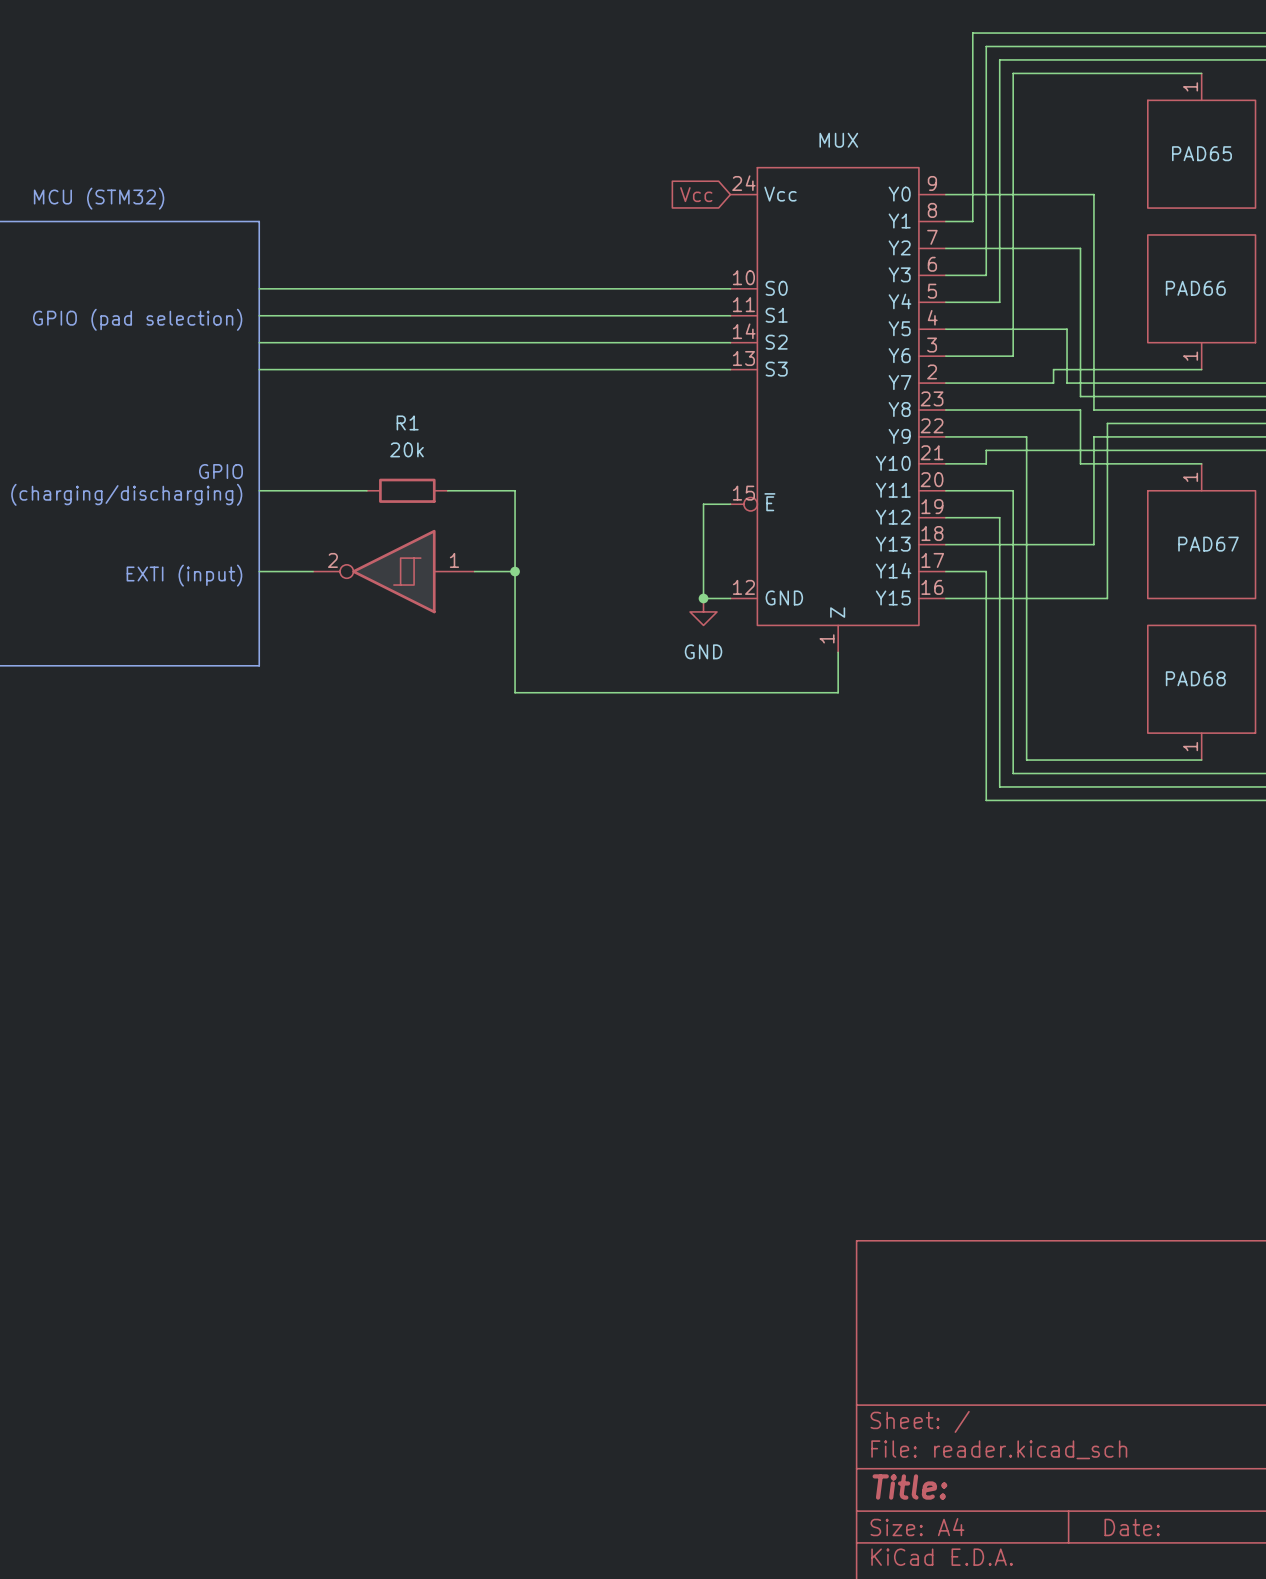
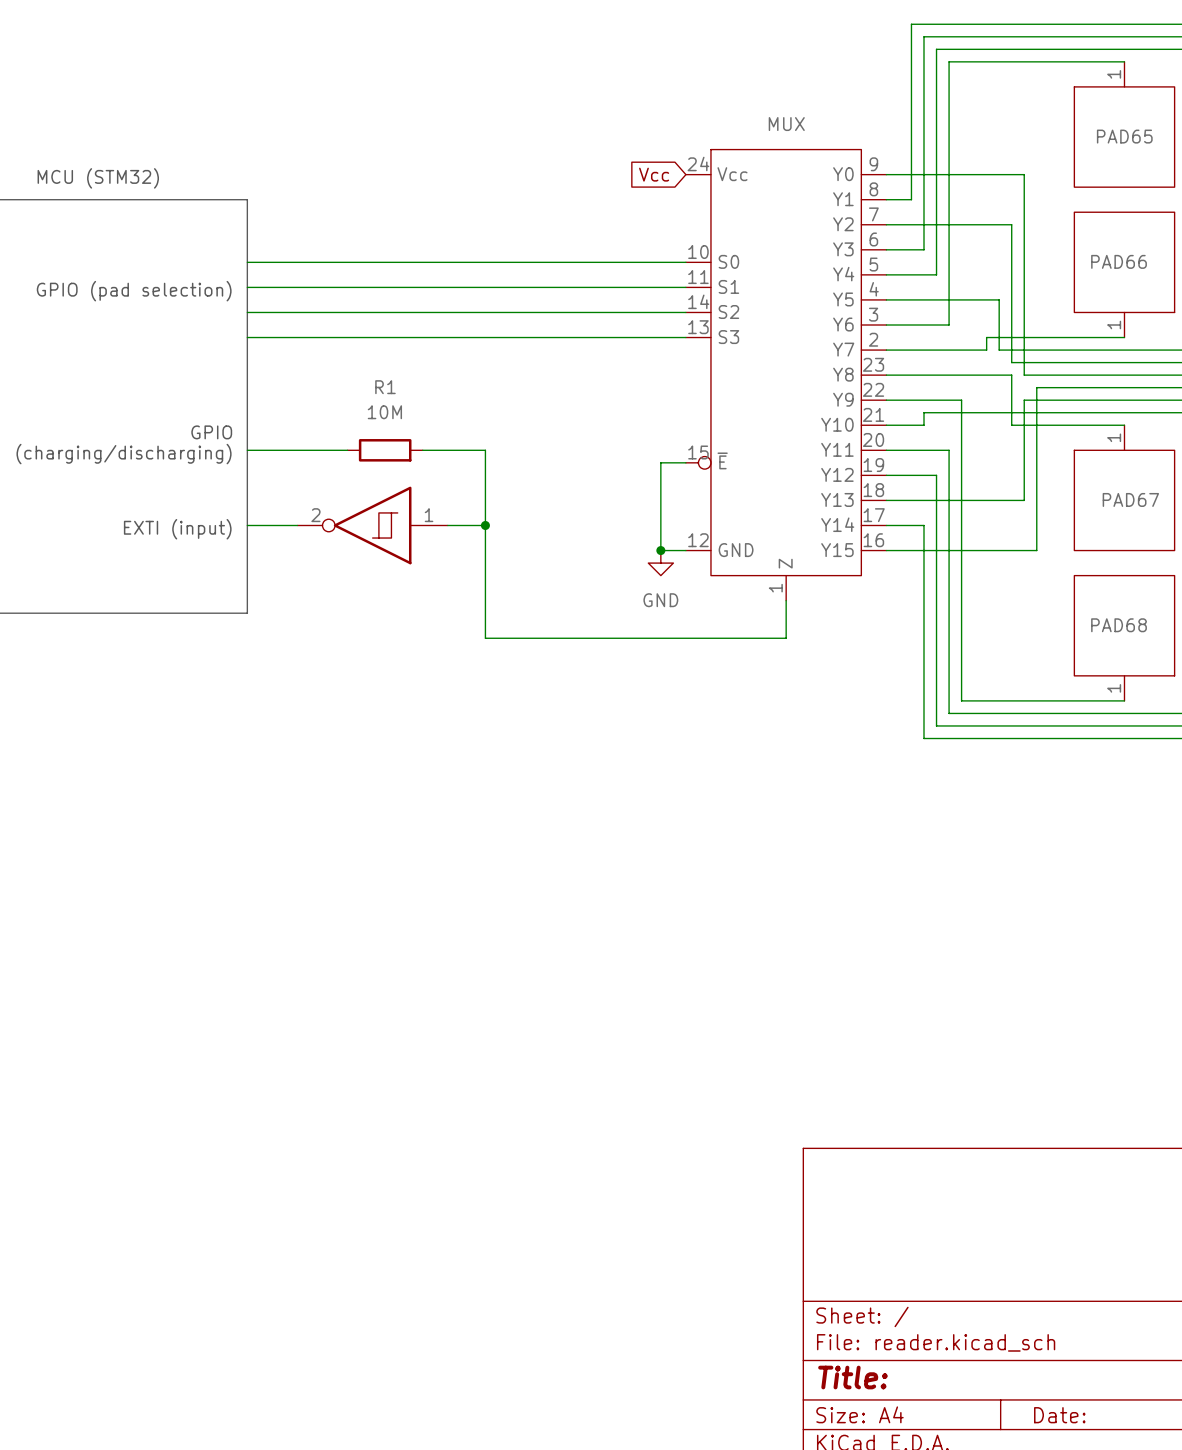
R1 value: 20k (407, 449) -> 10M (384, 412)

